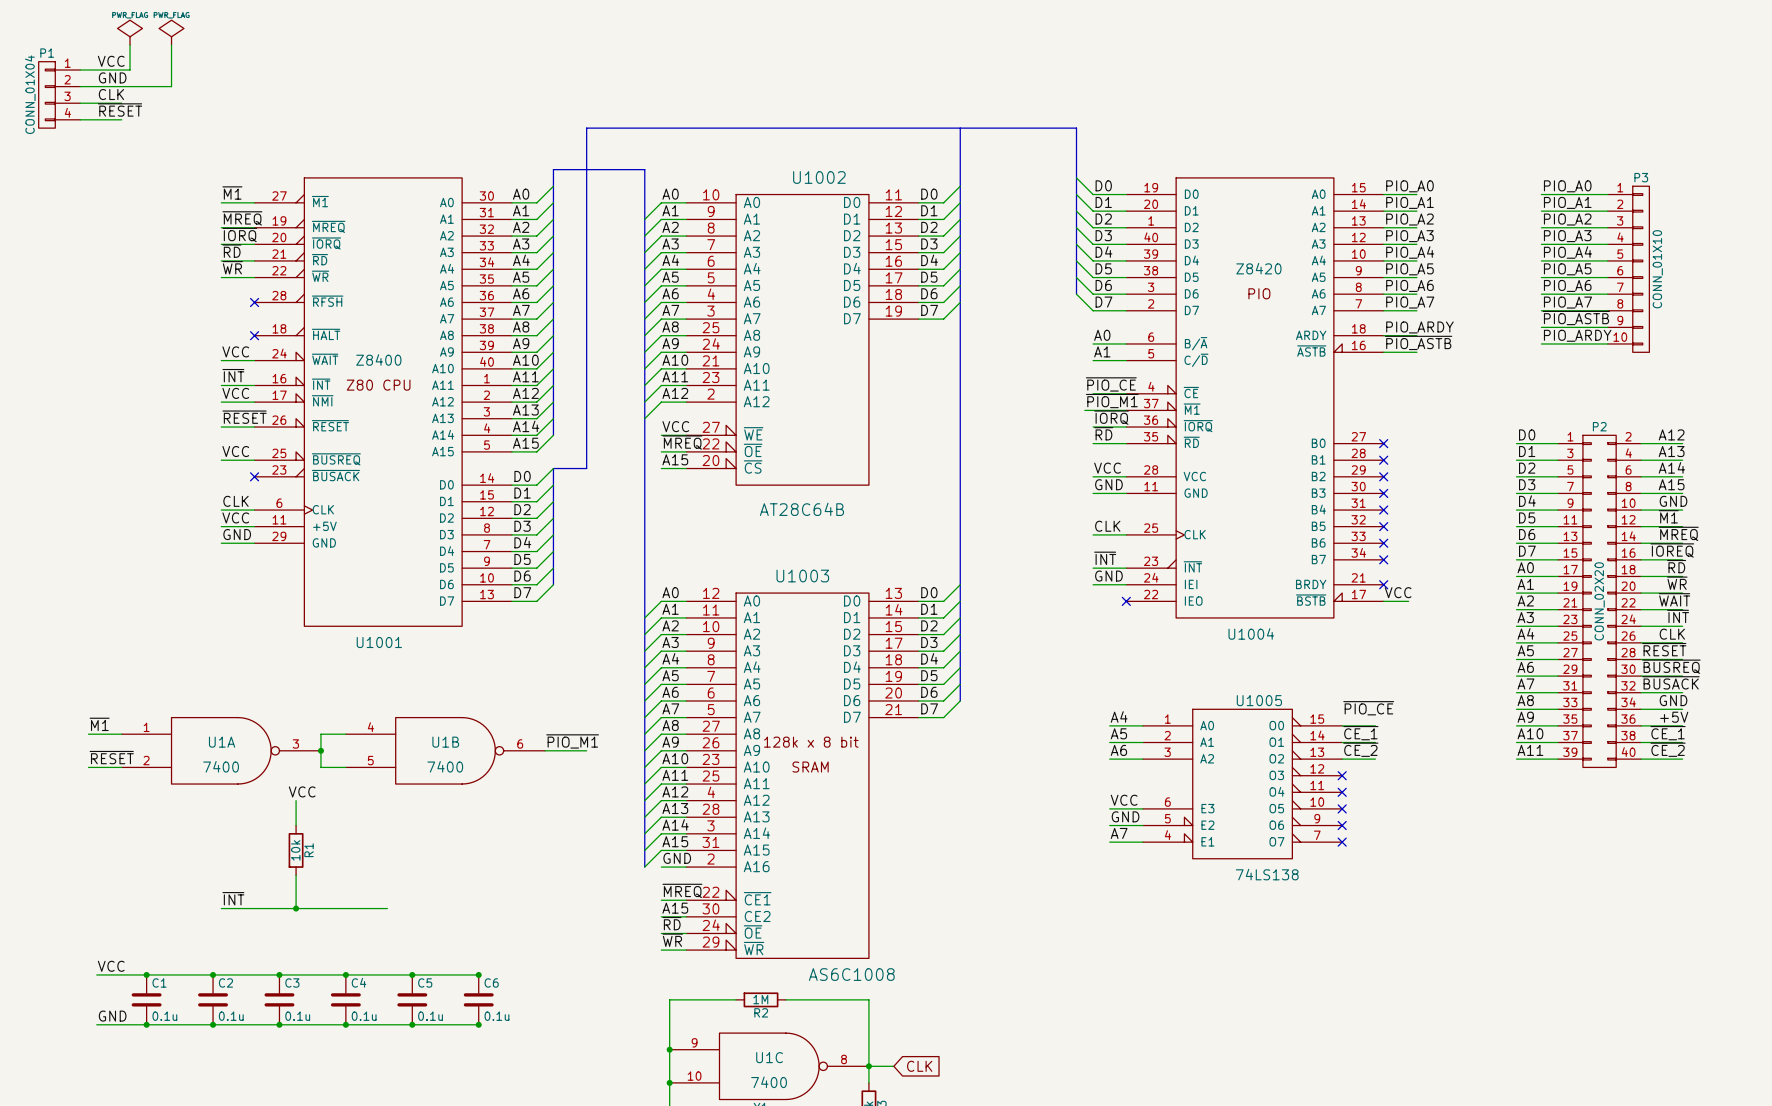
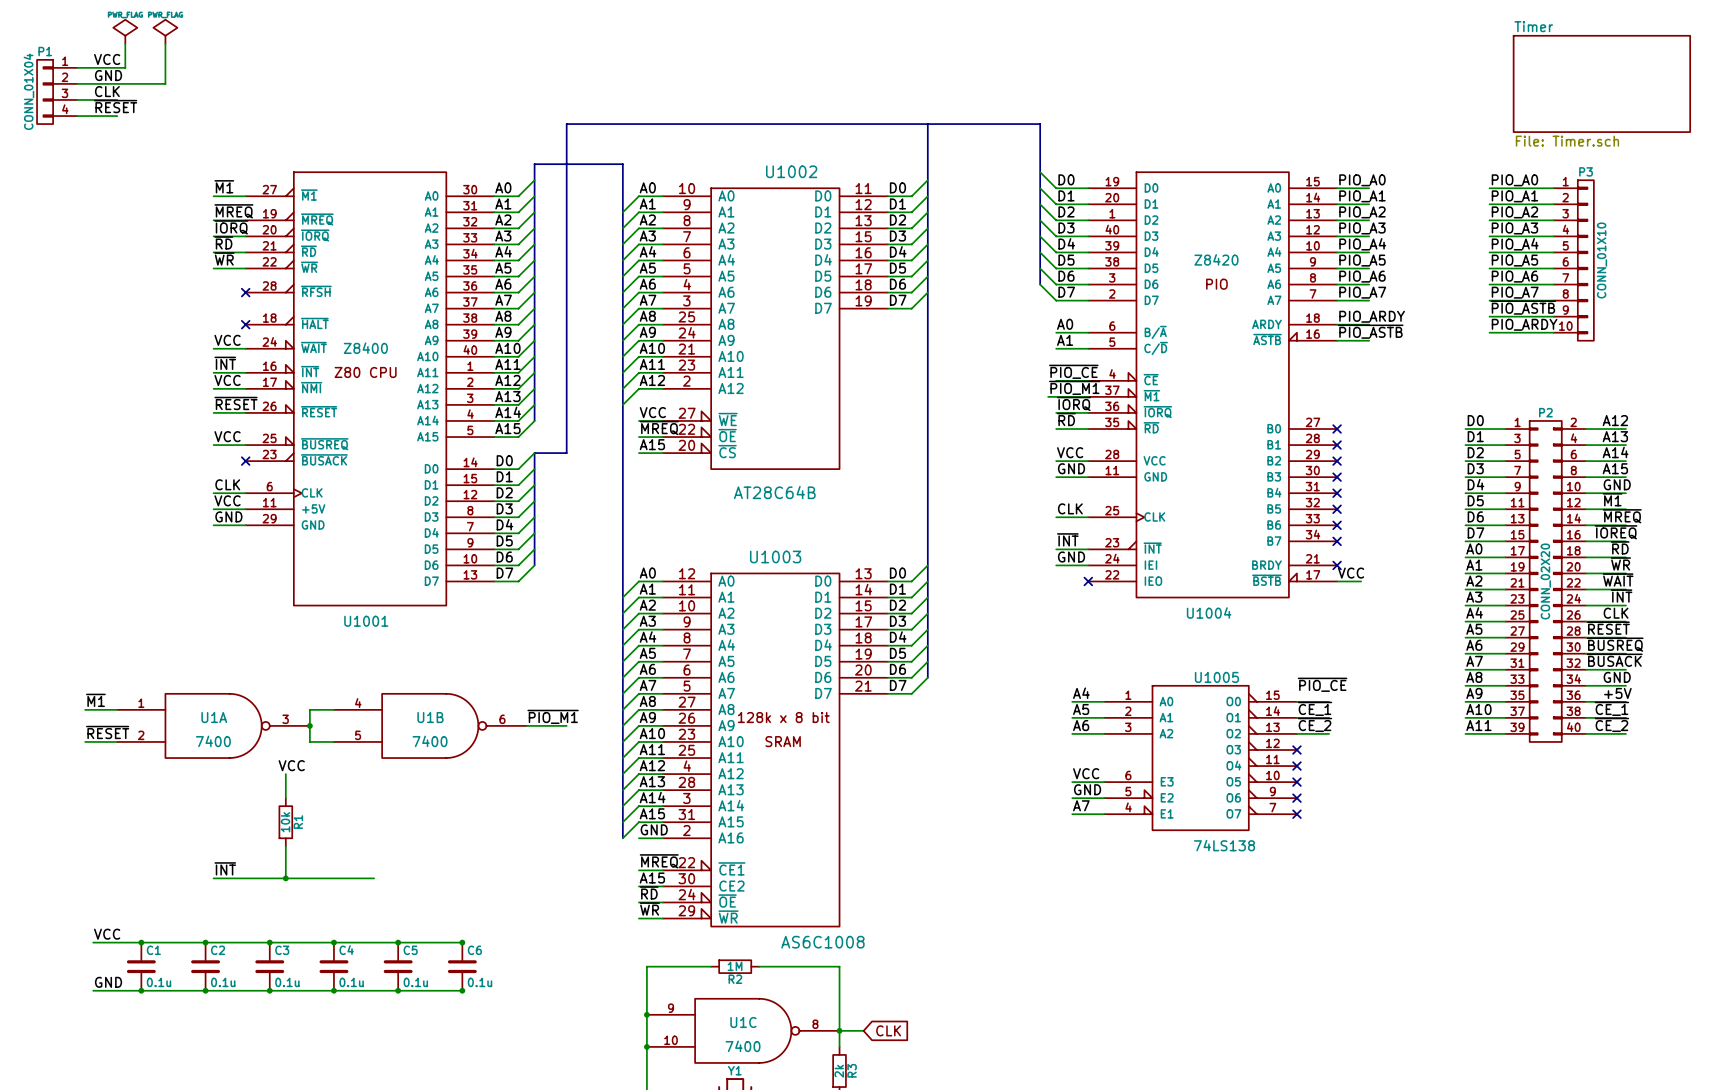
sheet Timer: none -> File: Timer.sch (1601, 83)

